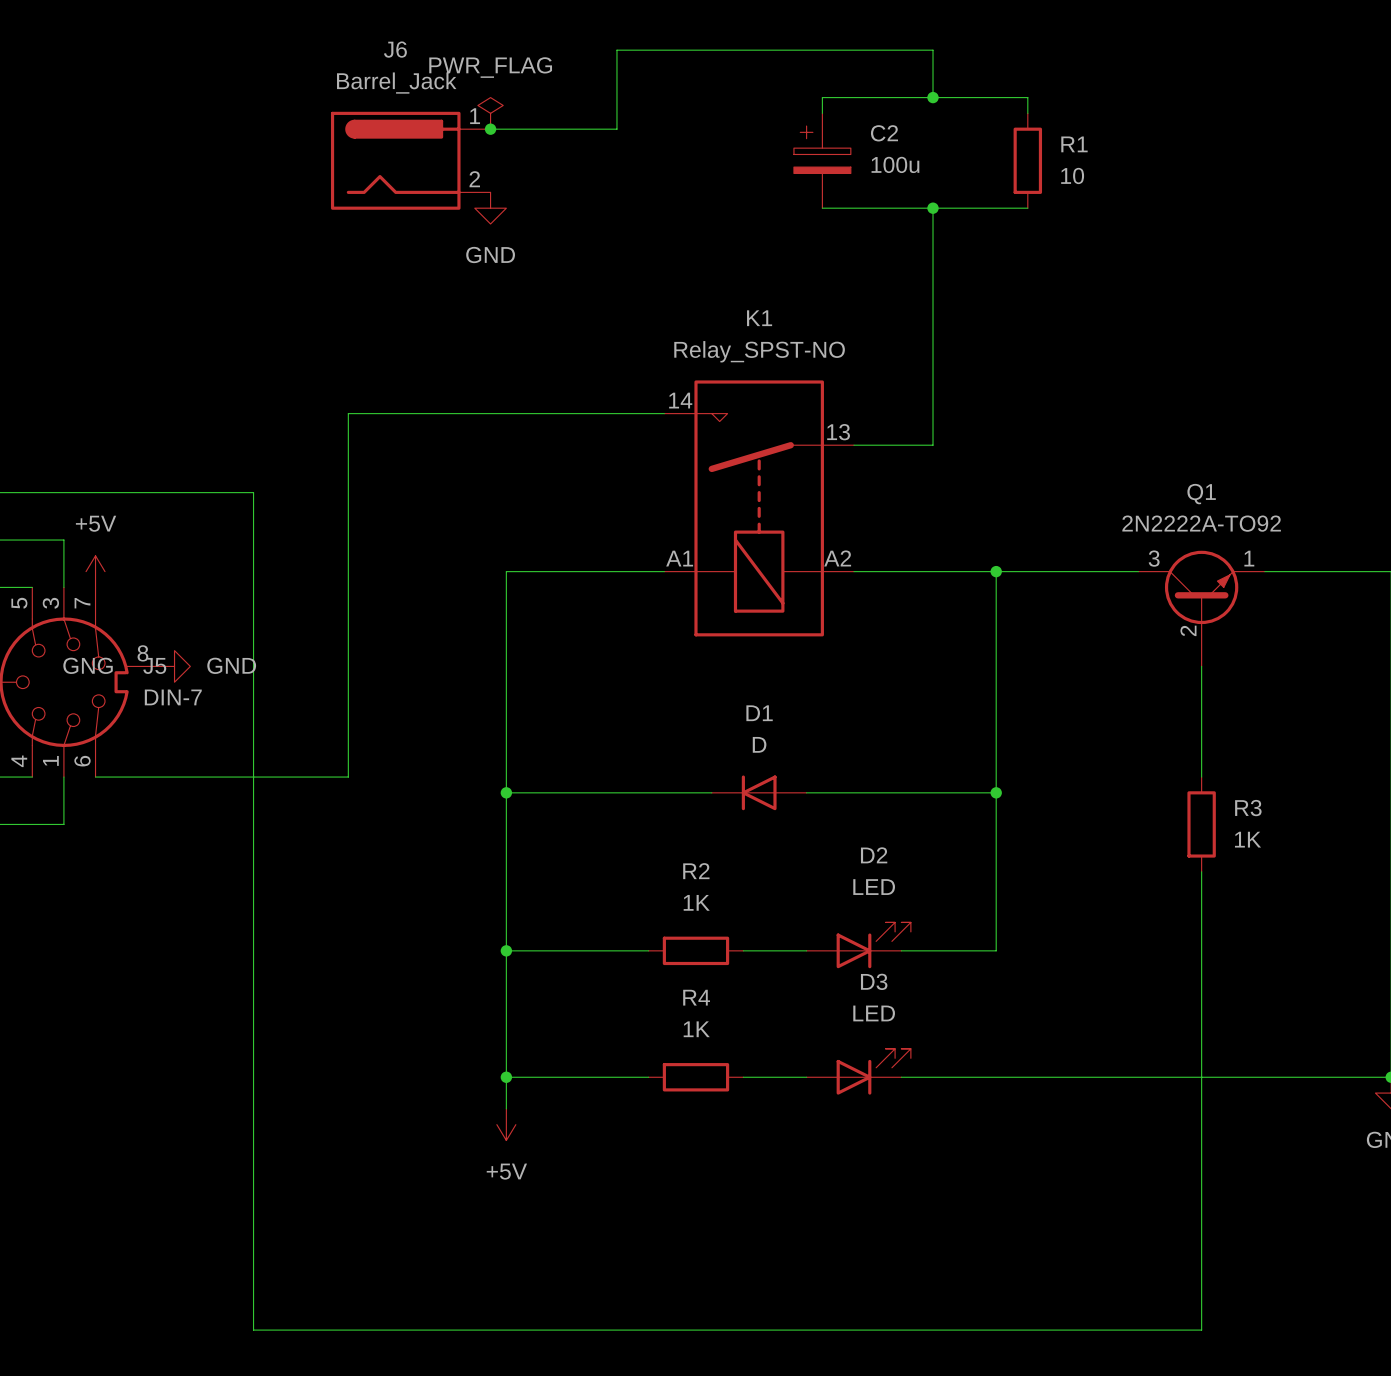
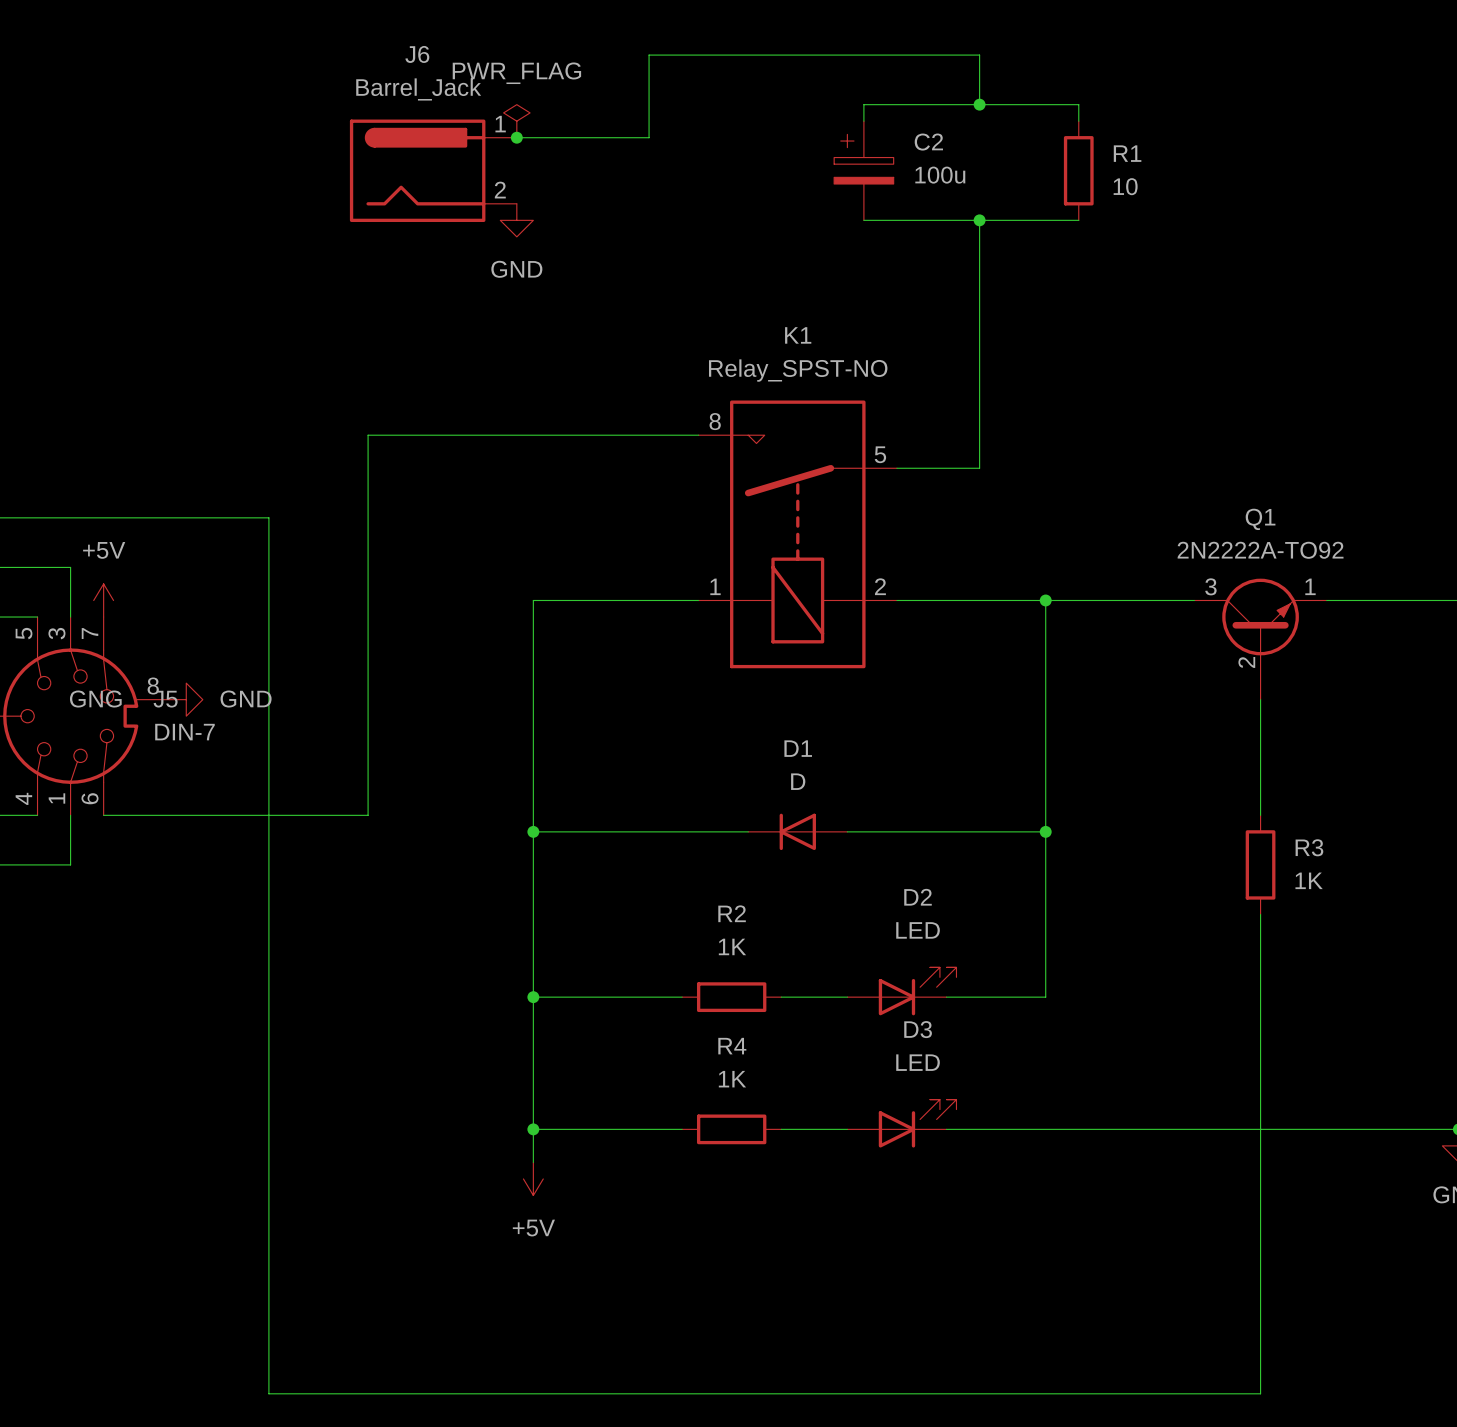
K1 pin number: 14 (680, 400) -> 8 (715, 421)
K1 pin number: 13 (838, 432) -> 5 (880, 454)
K1 pin number: A1 (679, 558) -> 1 (715, 586)
K1 pin number: A2 (837, 558) -> 2 (880, 586)

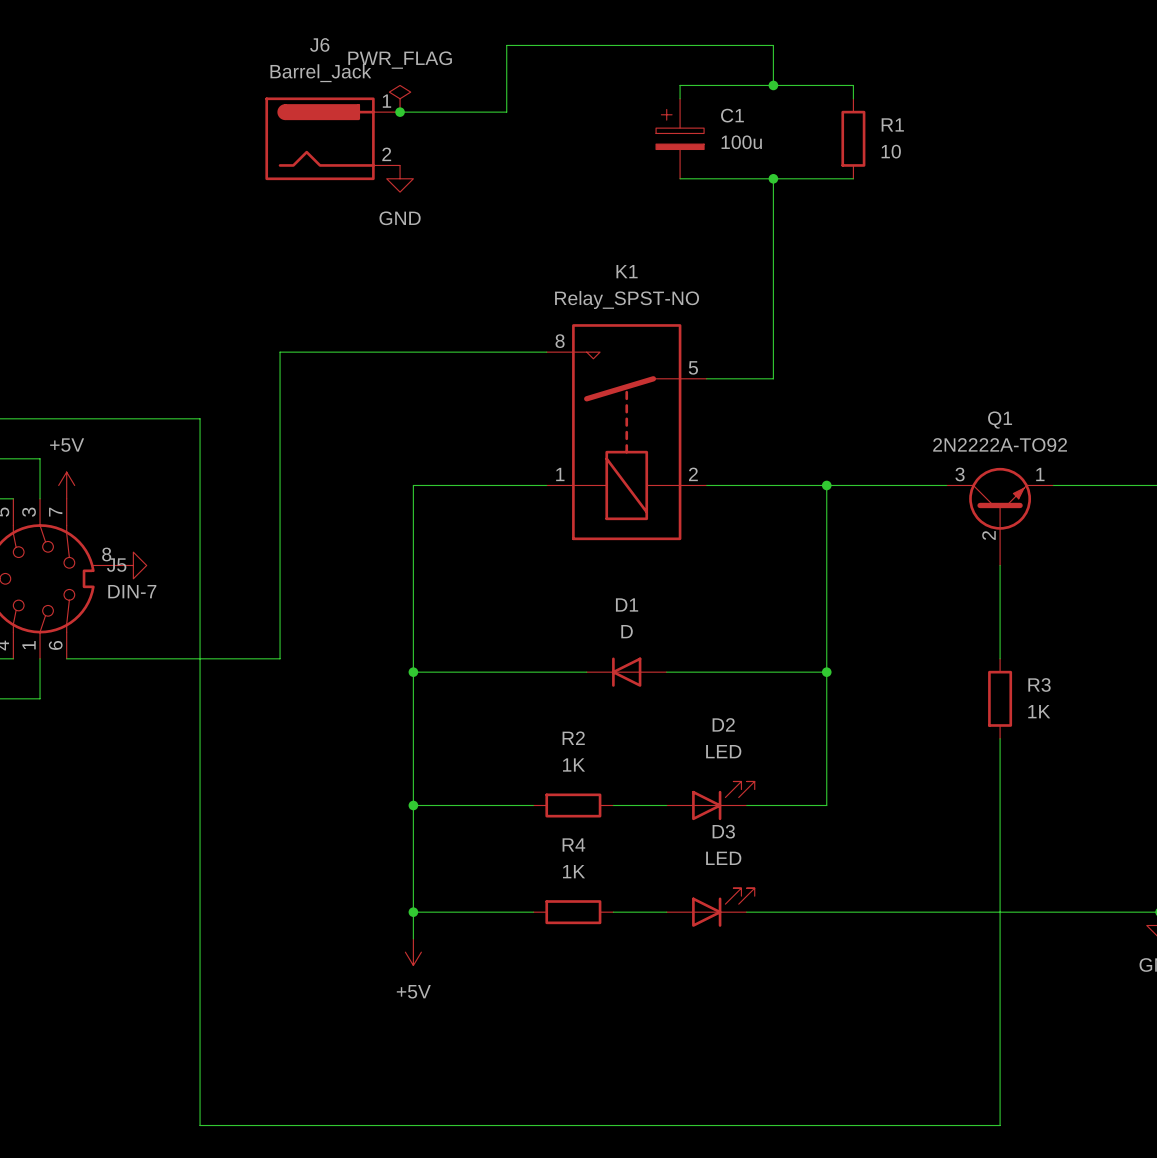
C2 name: C2 (928, 142) -> C1 (732, 115)
J5 pin name: GNG (95, 699) -> none
power symbol text: GND (246, 699) -> none

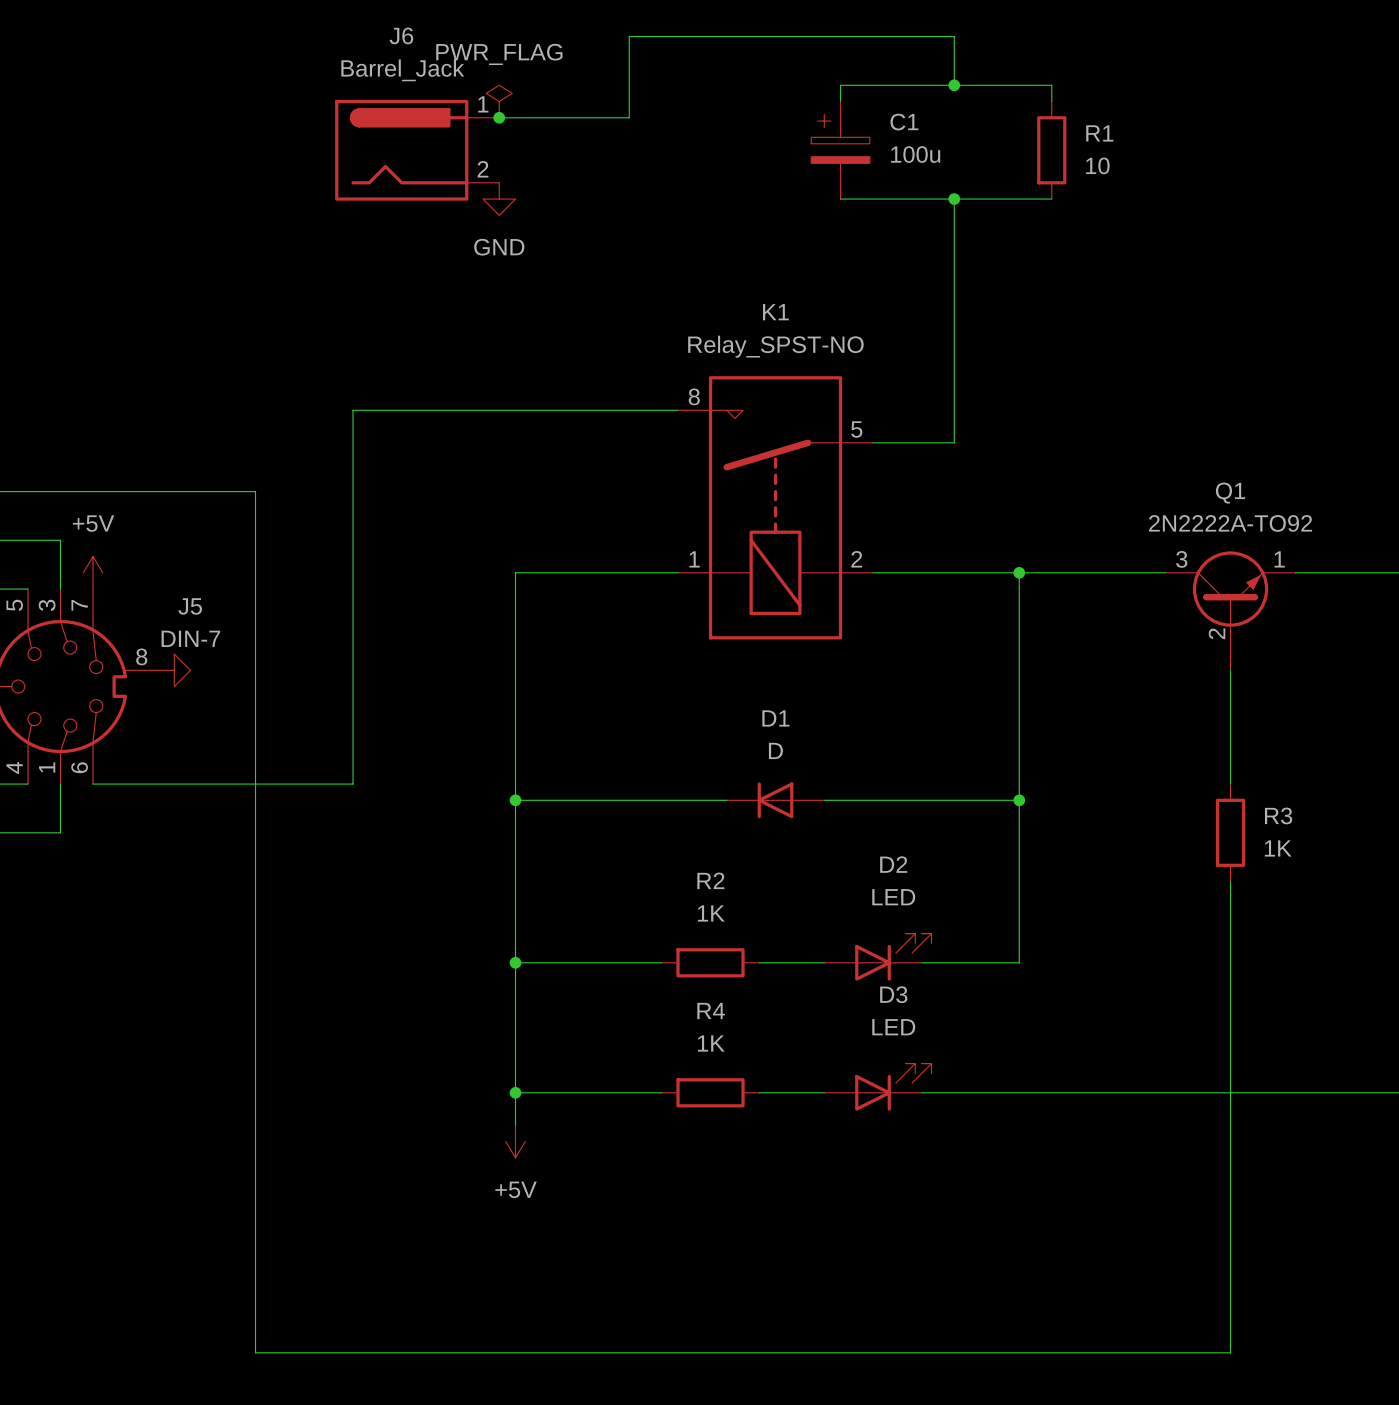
J5 name position: J5 (116, 565) -> J5 (190, 606)
J5 value position: DIN-7 (132, 591) -> DIN-7 (190, 638)

